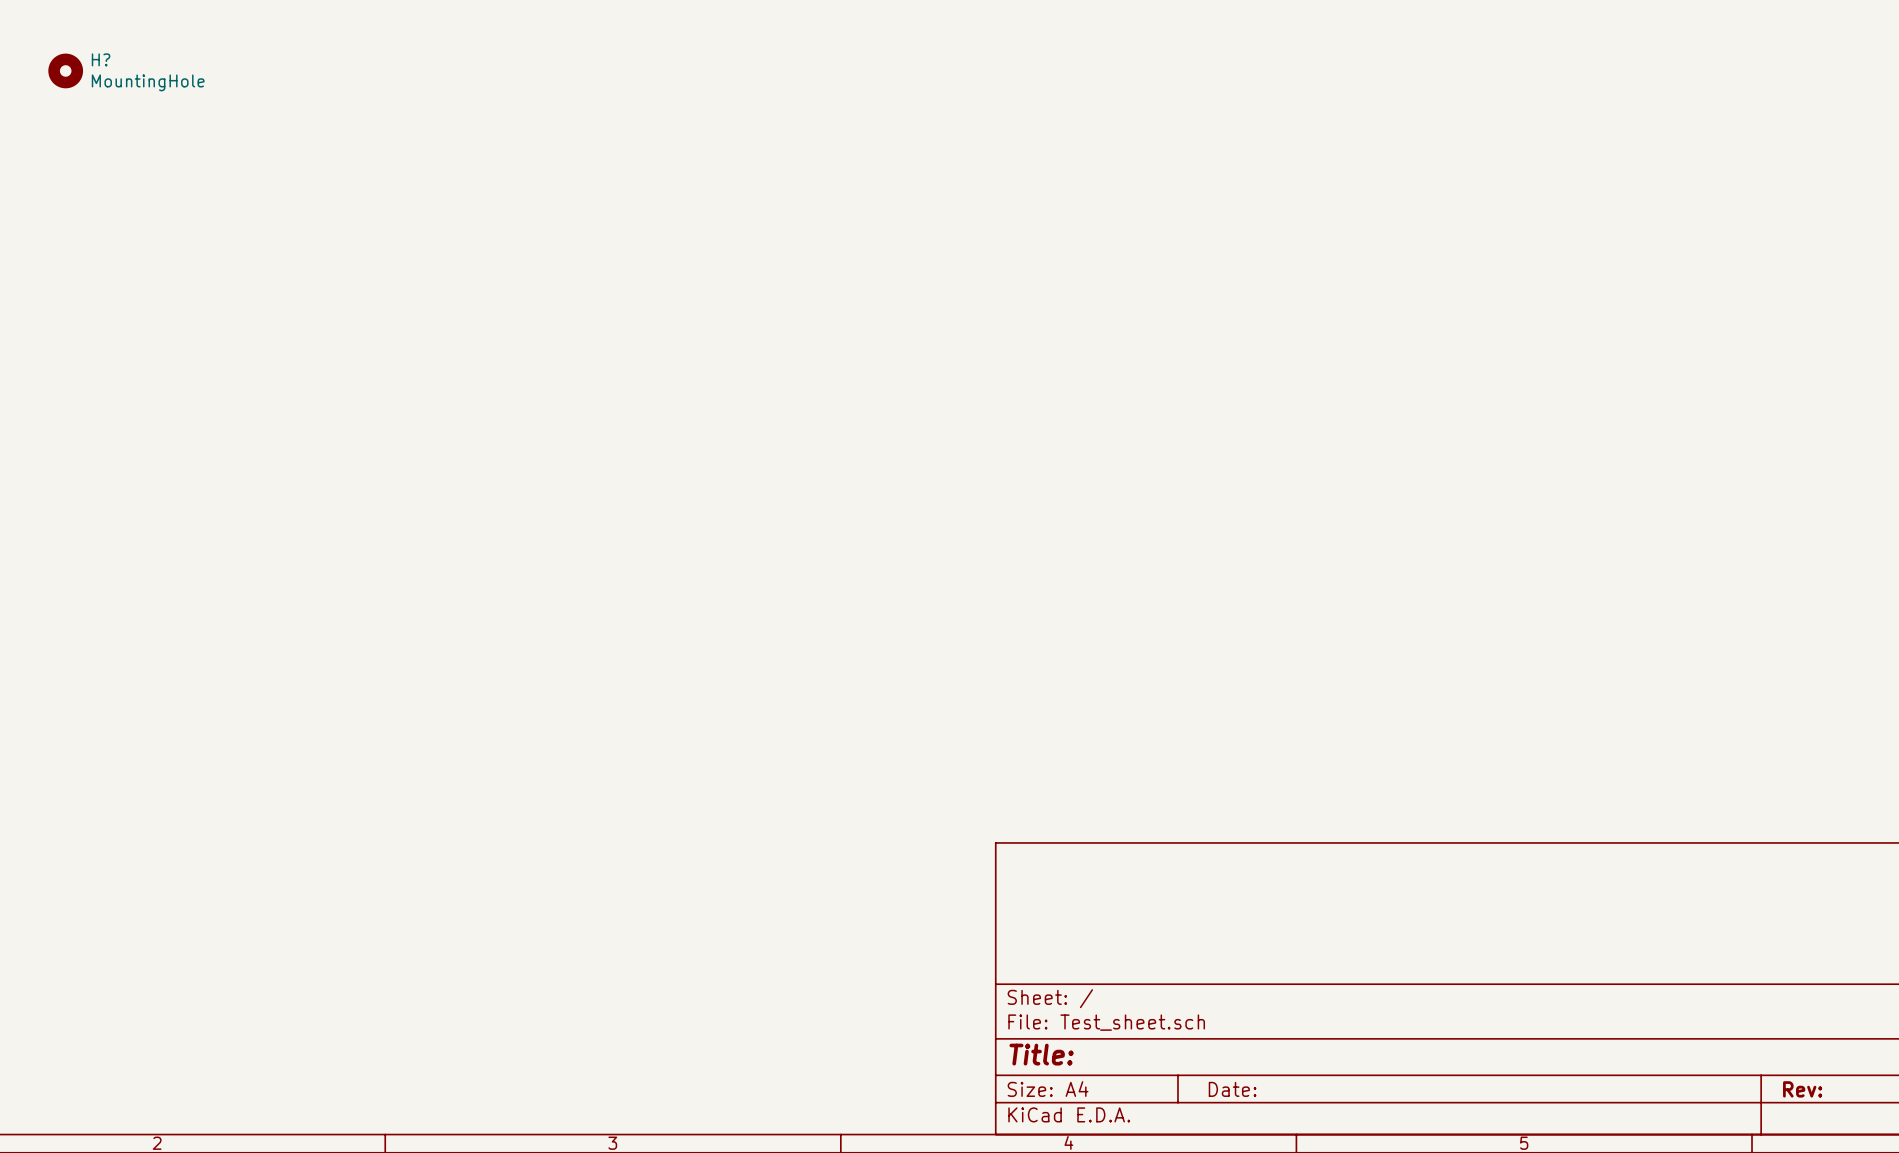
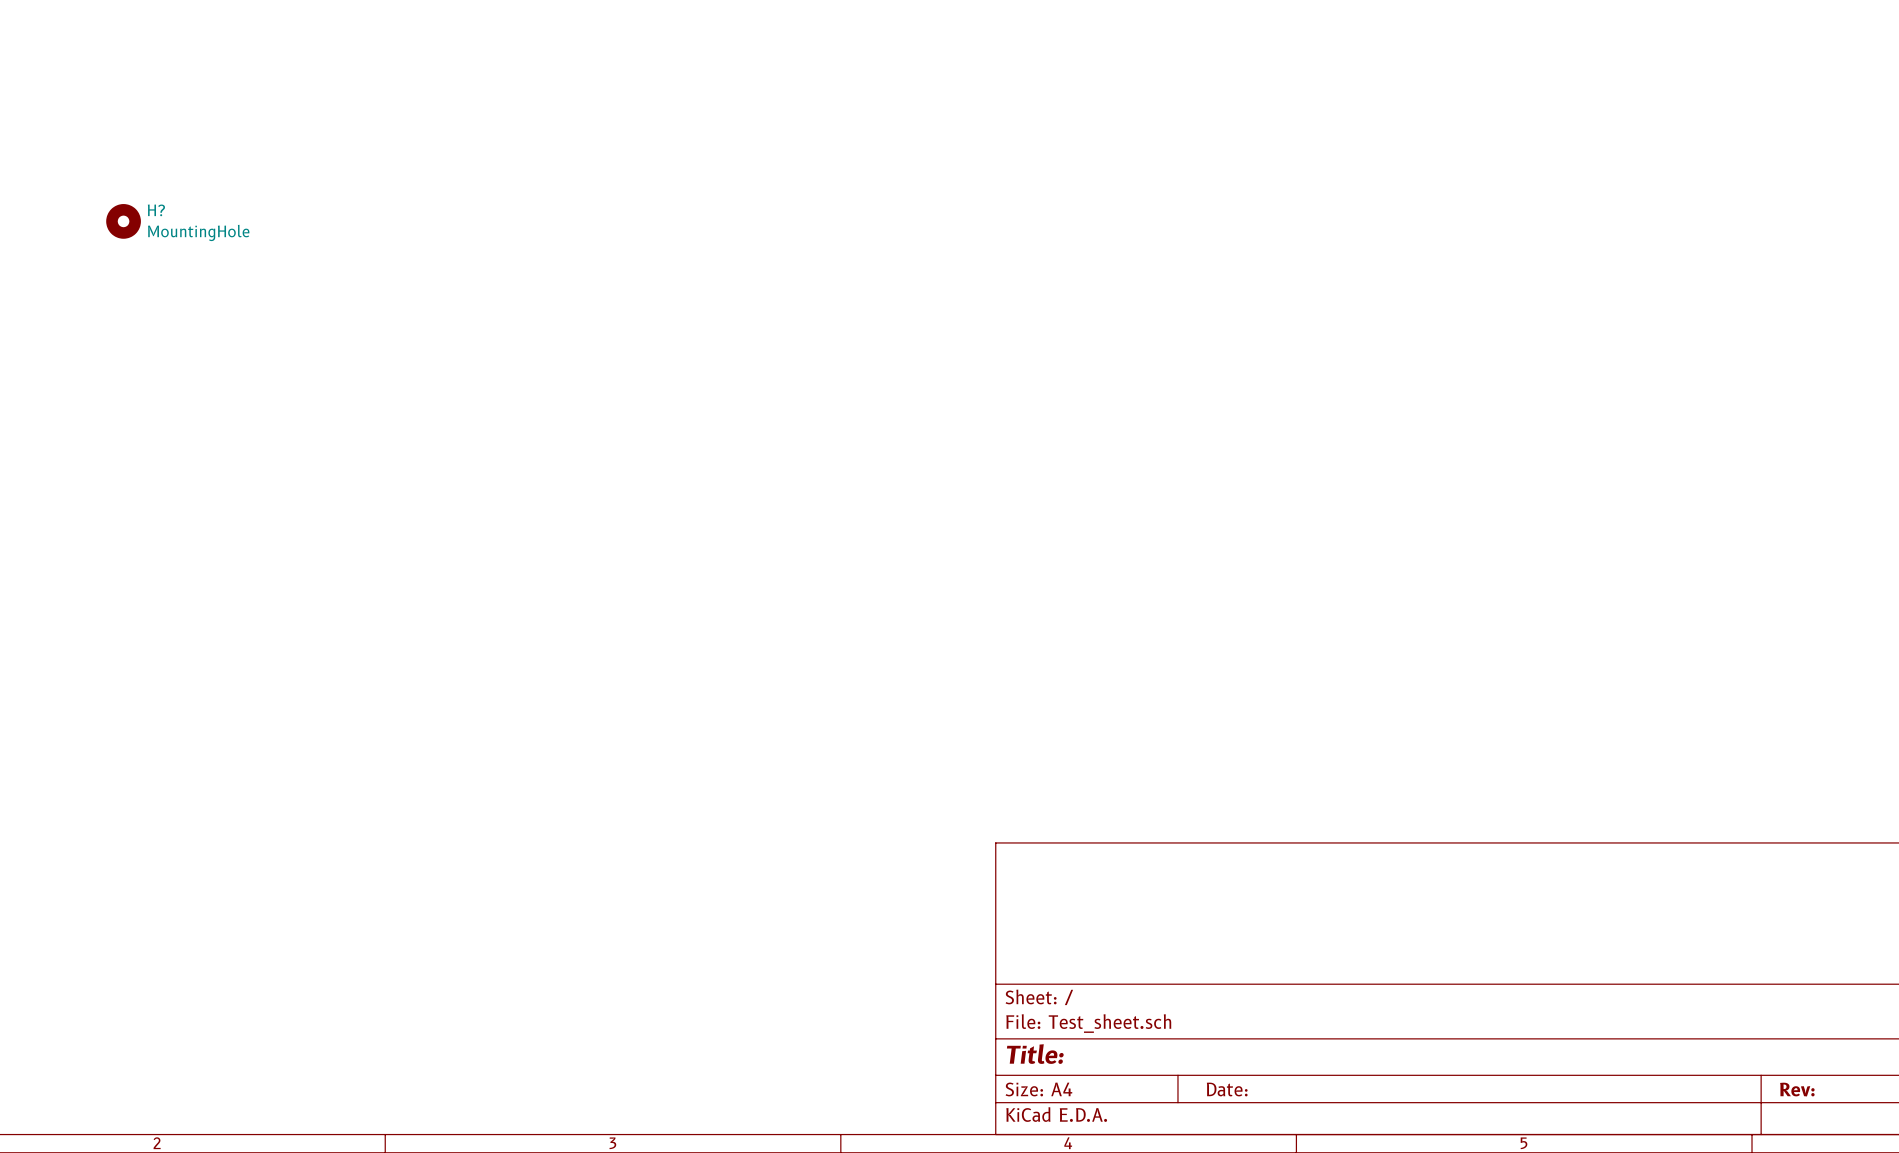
H? position: (65, 70) -> (123, 221)

